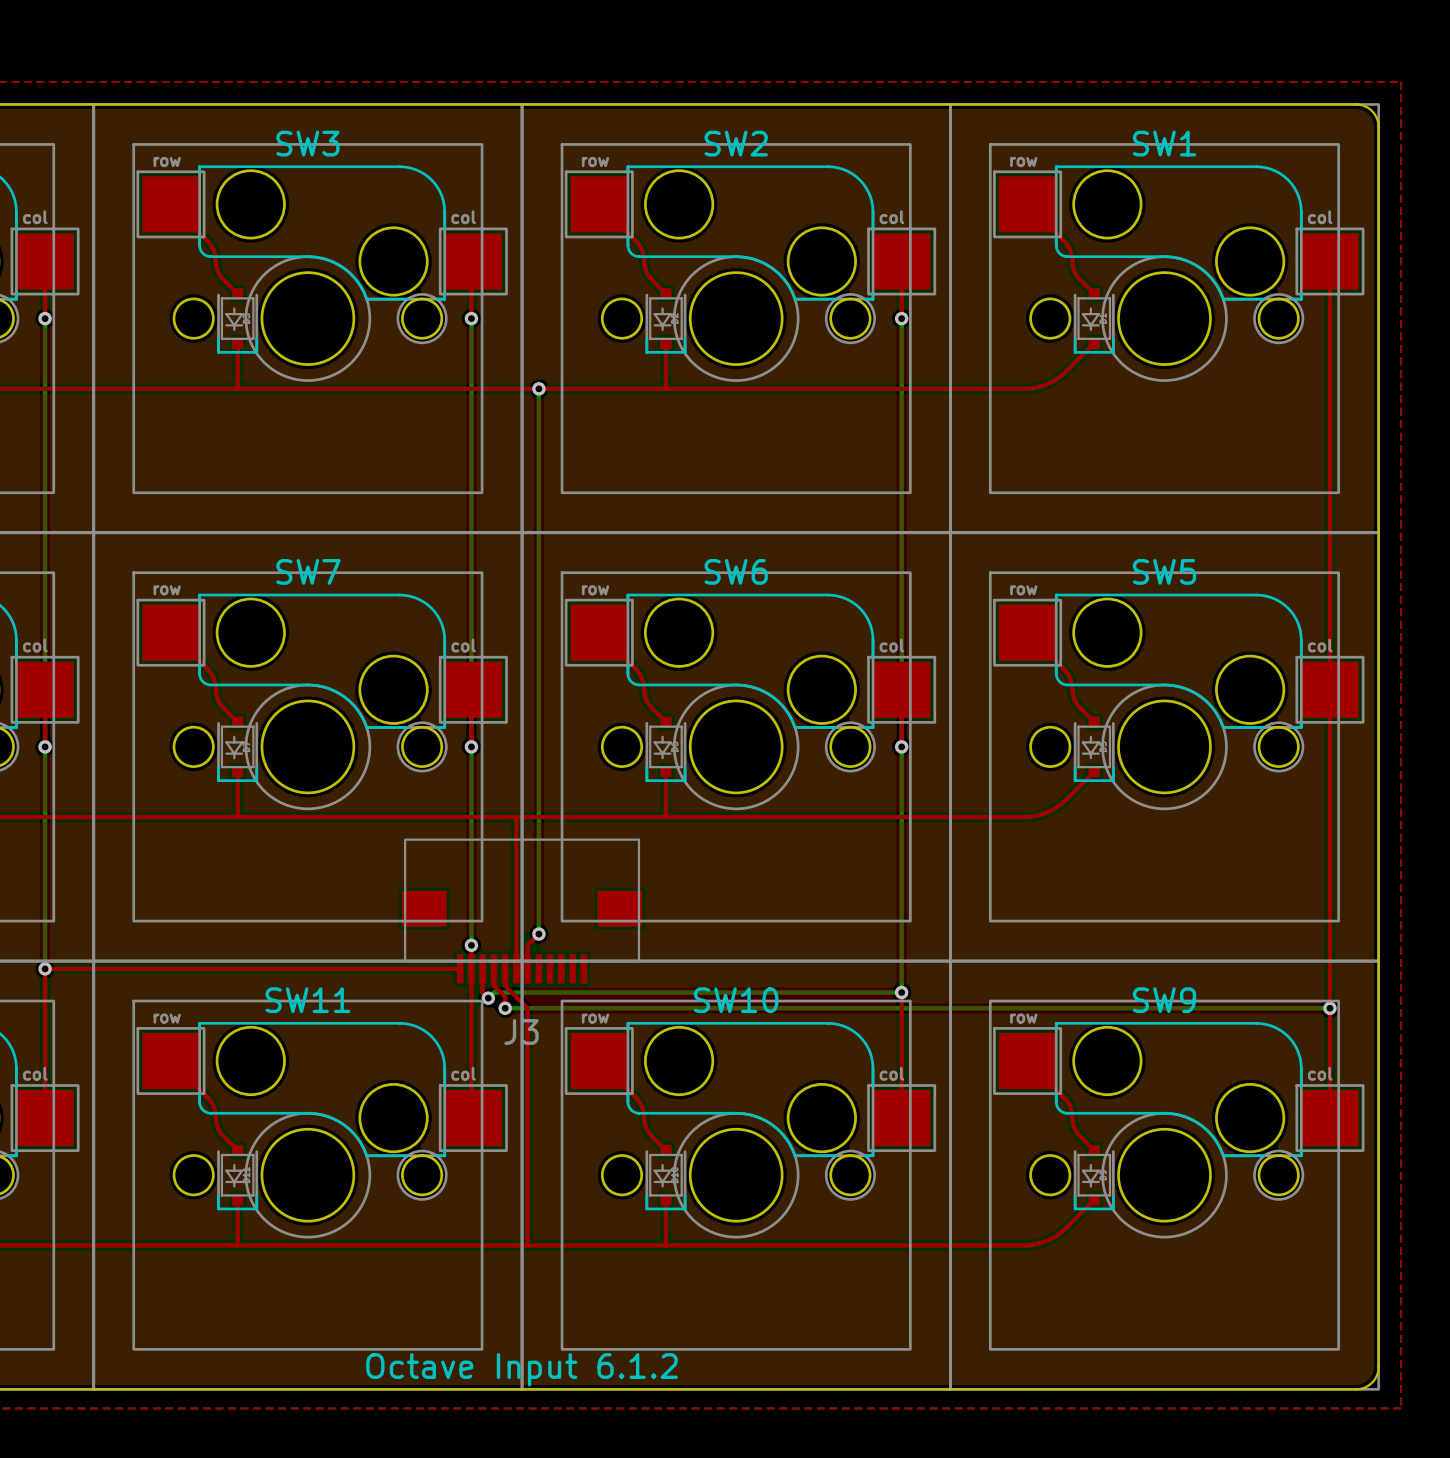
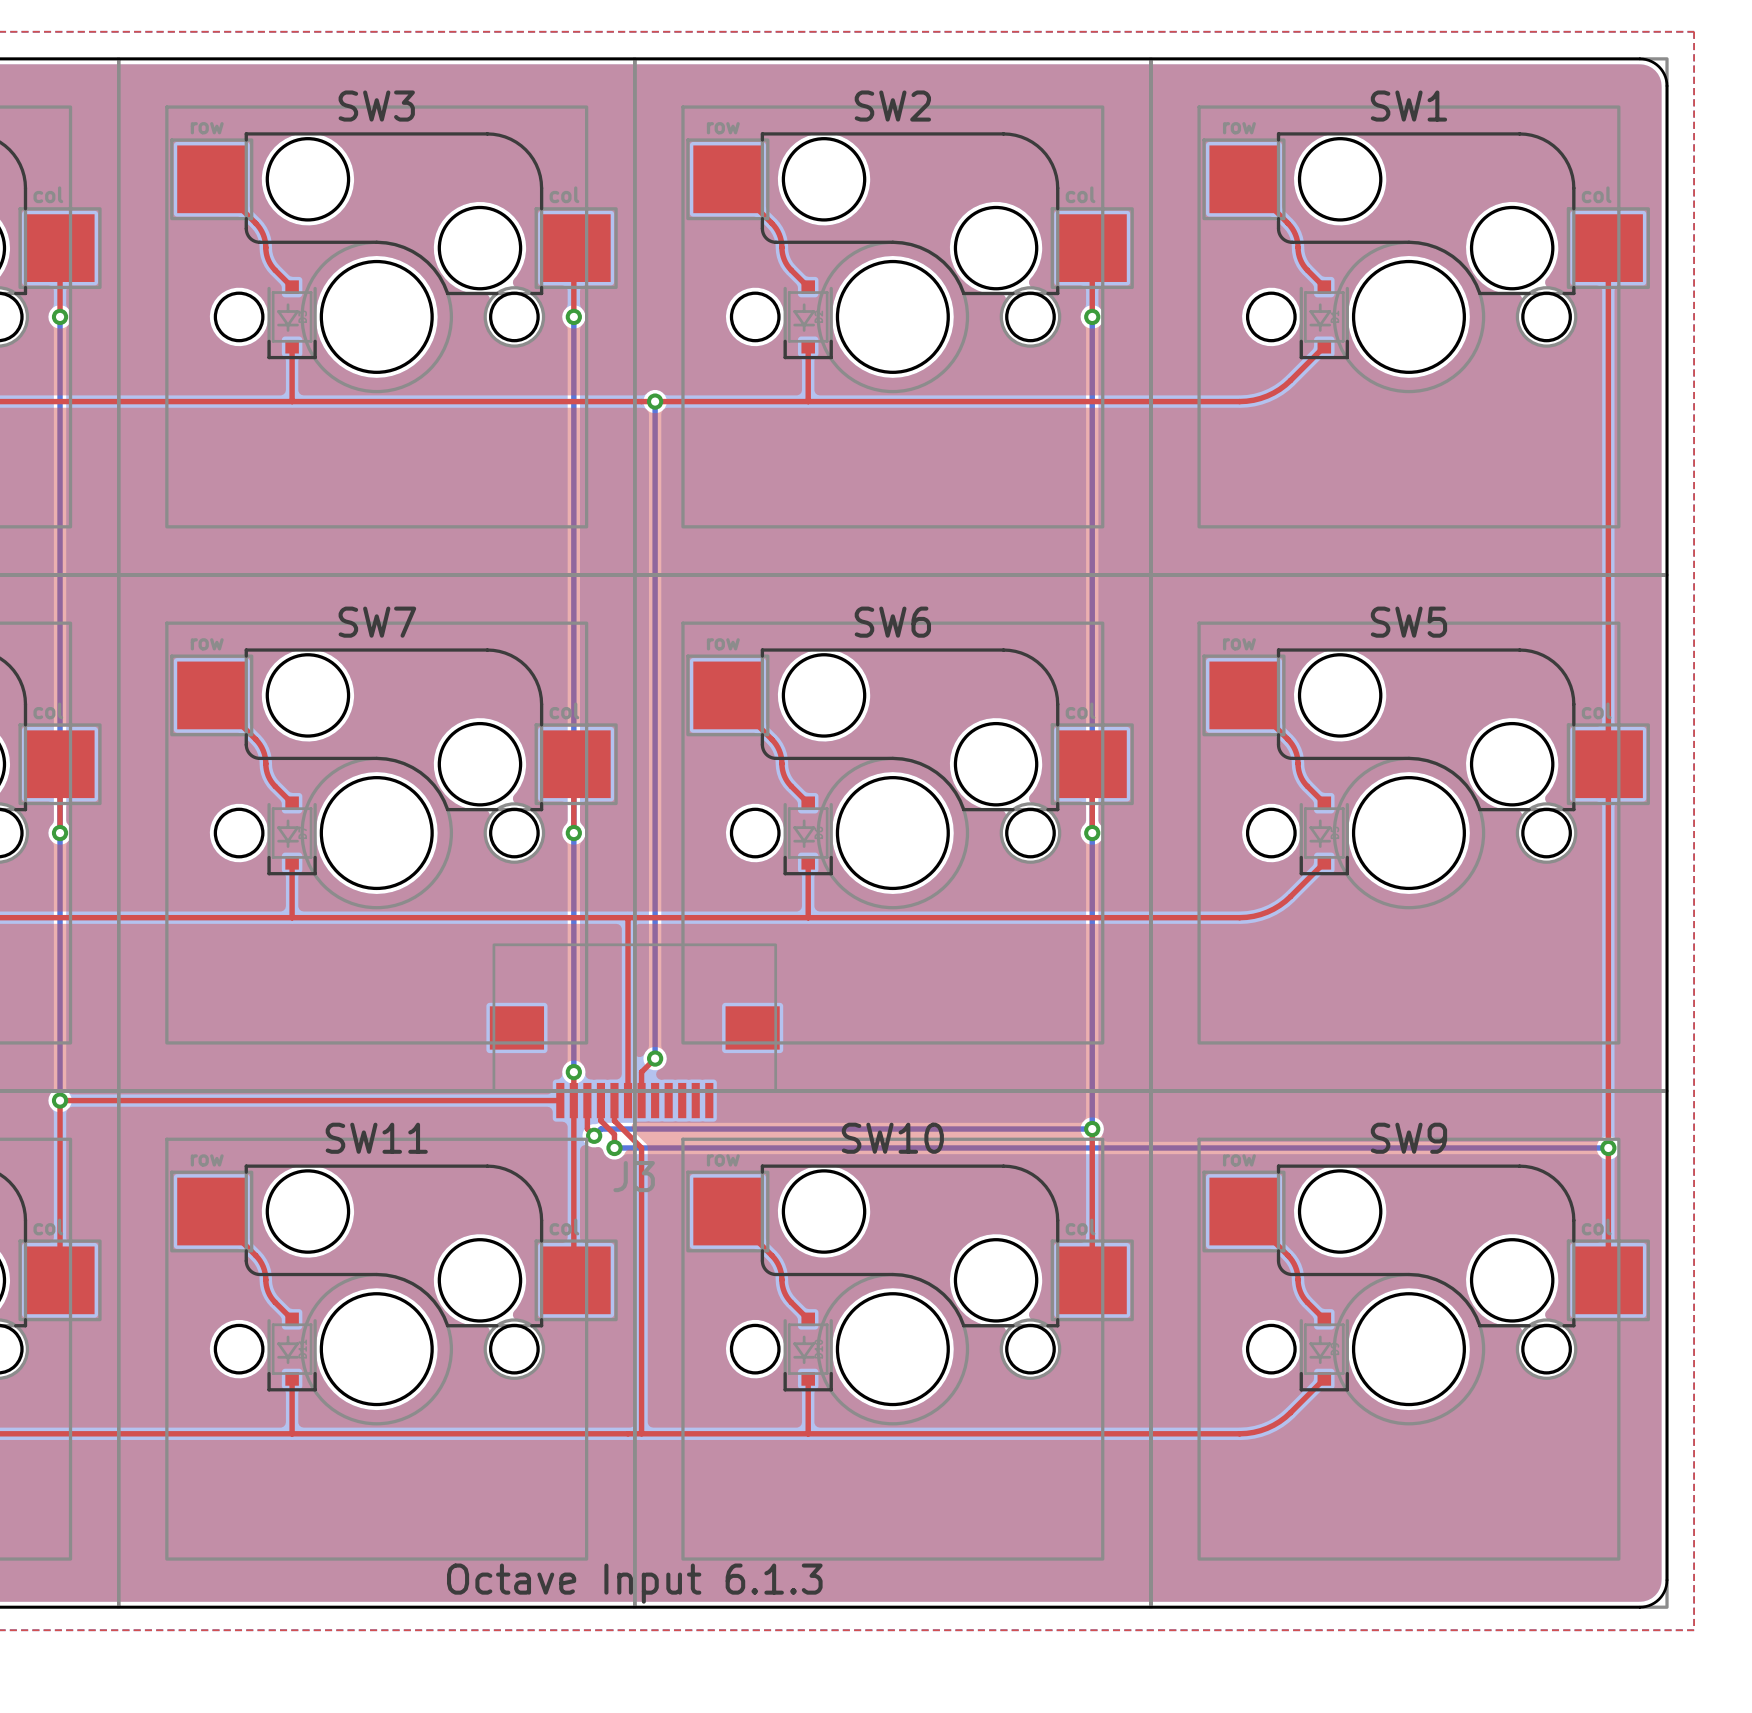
text: Octave Input 6.1.2 (522, 1369) -> Octave Input 6.1.3 (634, 1583)

